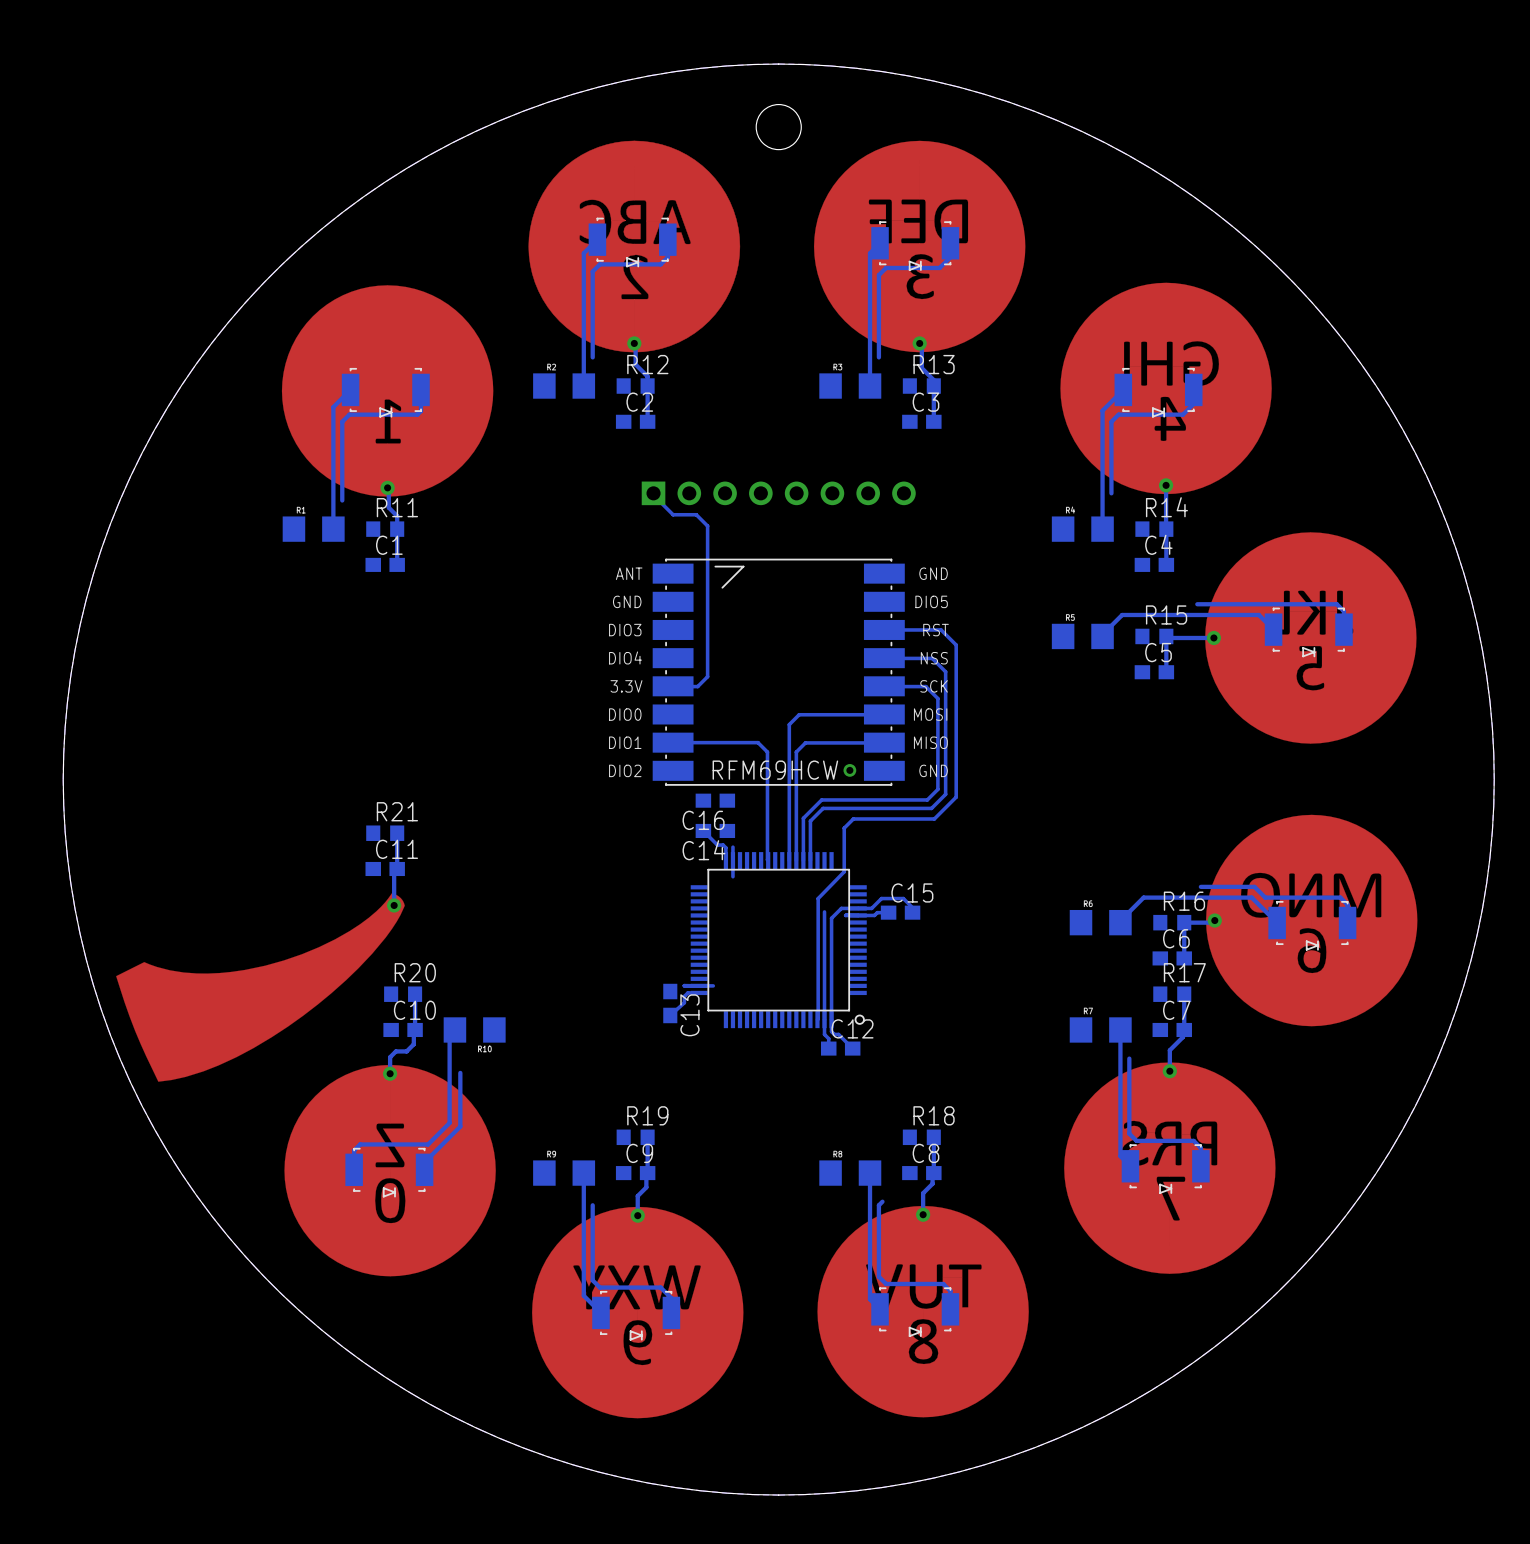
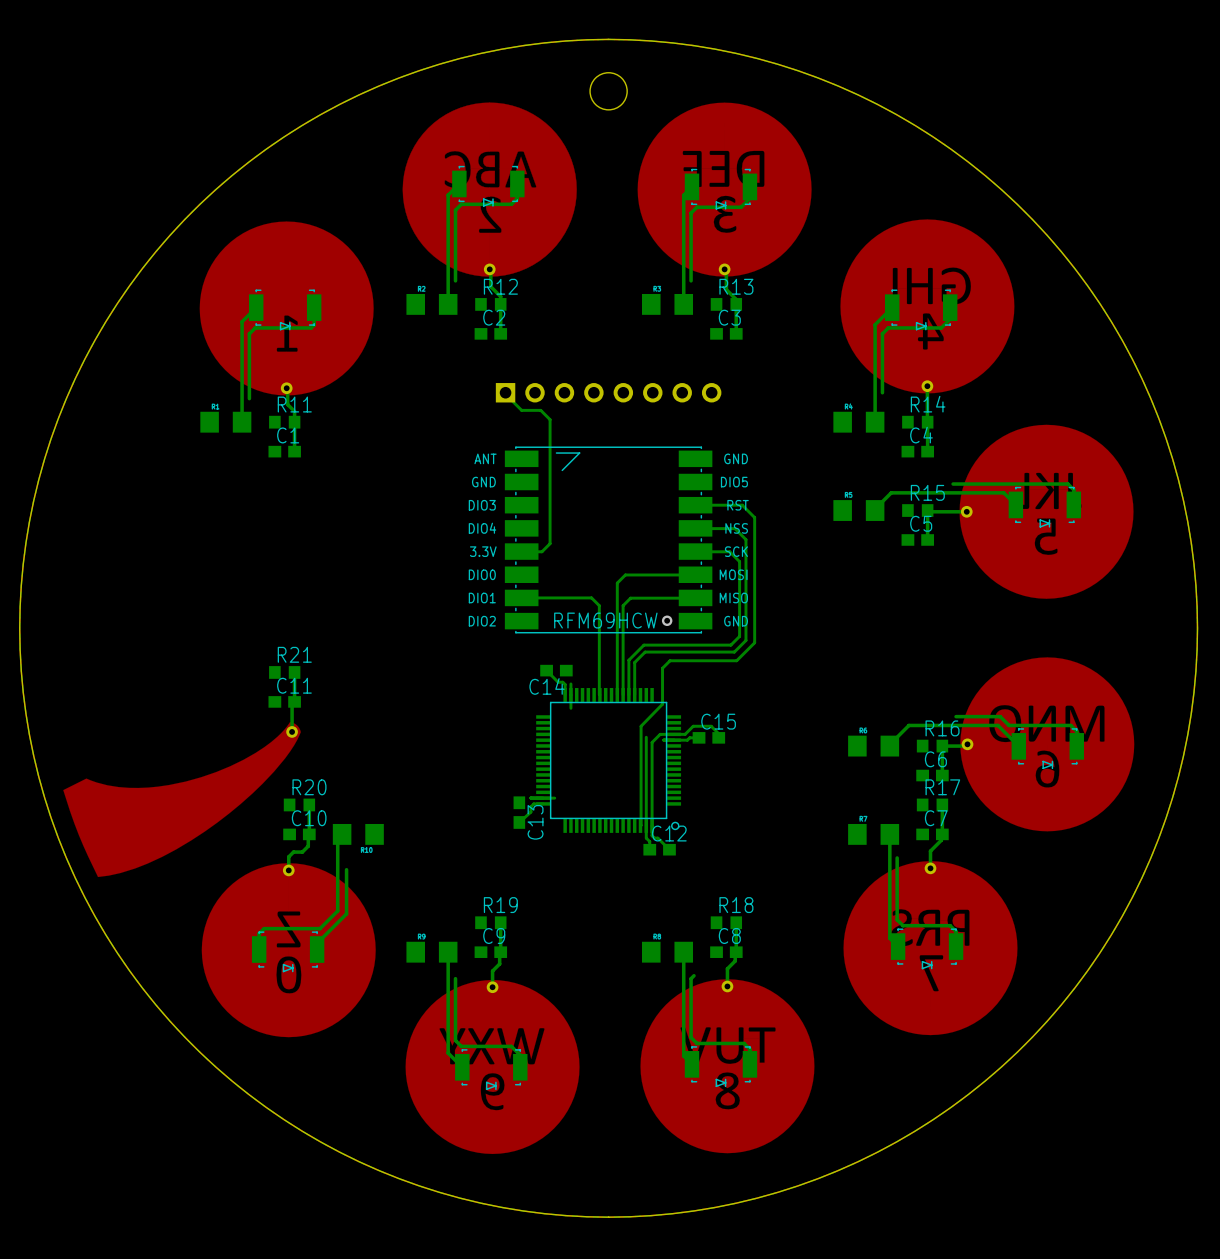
C16: (715, 800) -> none

